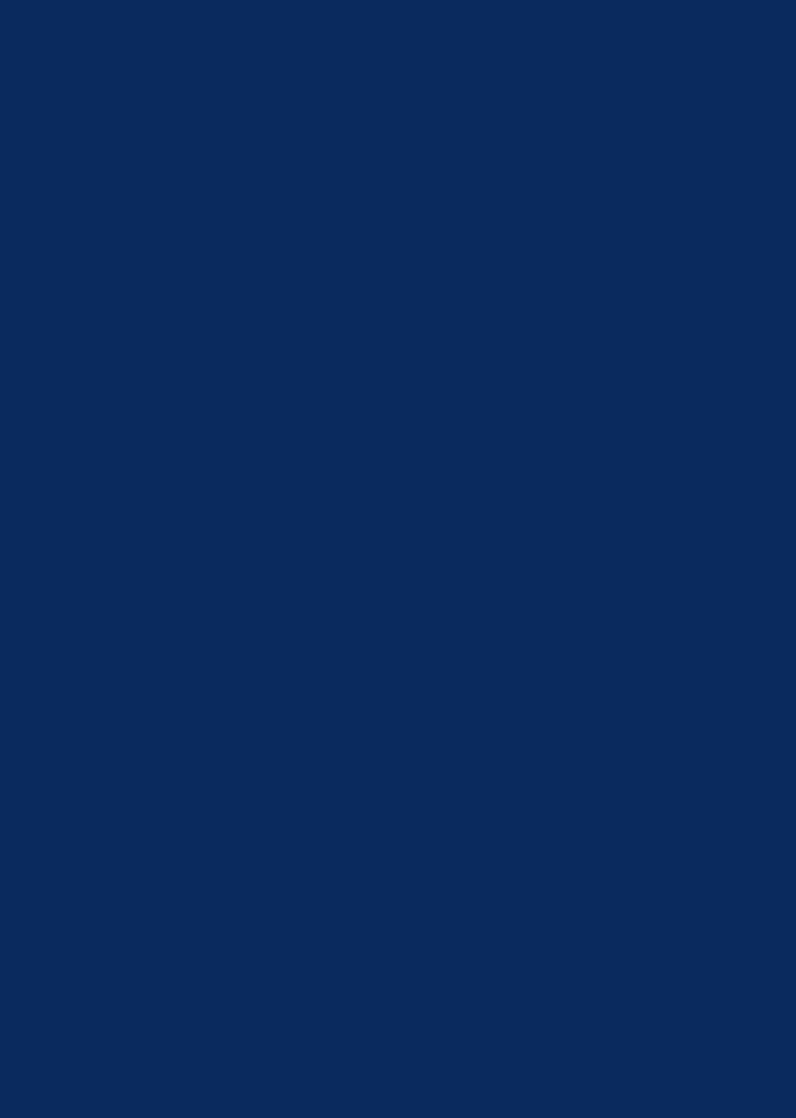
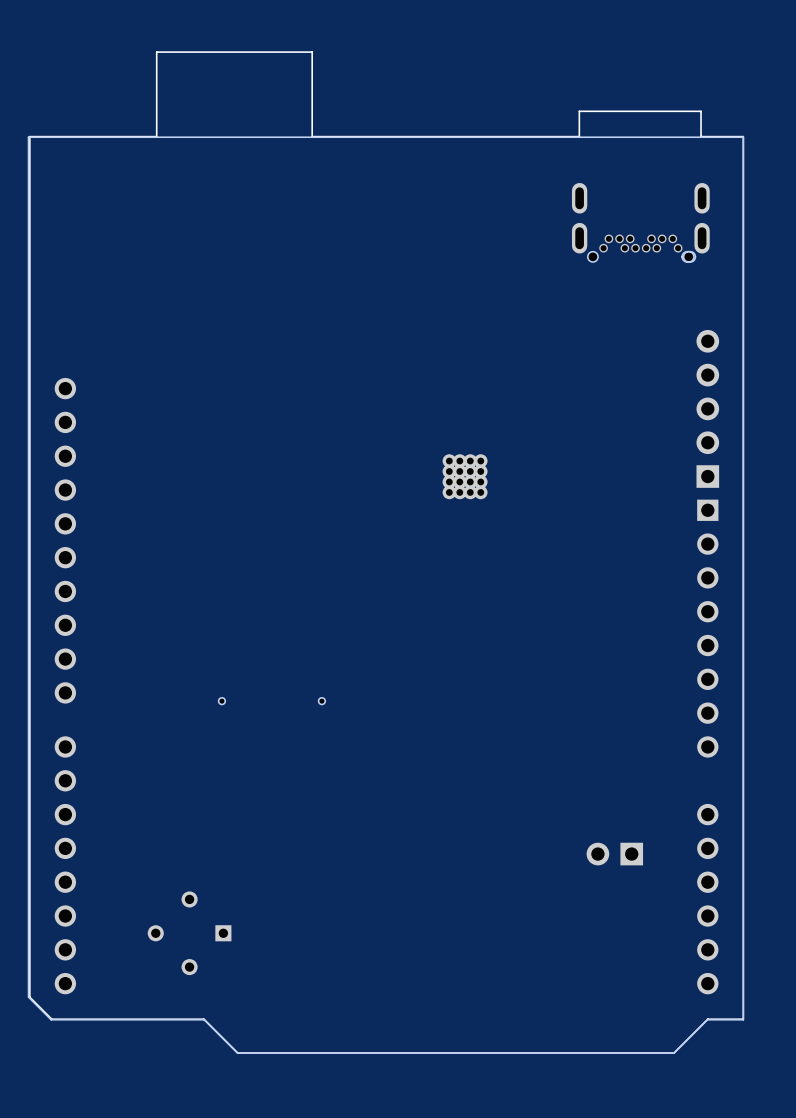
board edge: none -> (743, 137) (743, 1019) (707, 1019) (674, 1053) (237, 1053) (204, 1019) (51, 1019) (28, 997) (28, 137) (743, 137)
part: none -> (640, 222)
part: none -> (707, 408)
part: none -> (465, 476)
part: none -> (386, 552)
part: none -> (221, 701)
part: none -> (321, 701)
part: none -> (614, 854)
part: none -> (189, 933)

